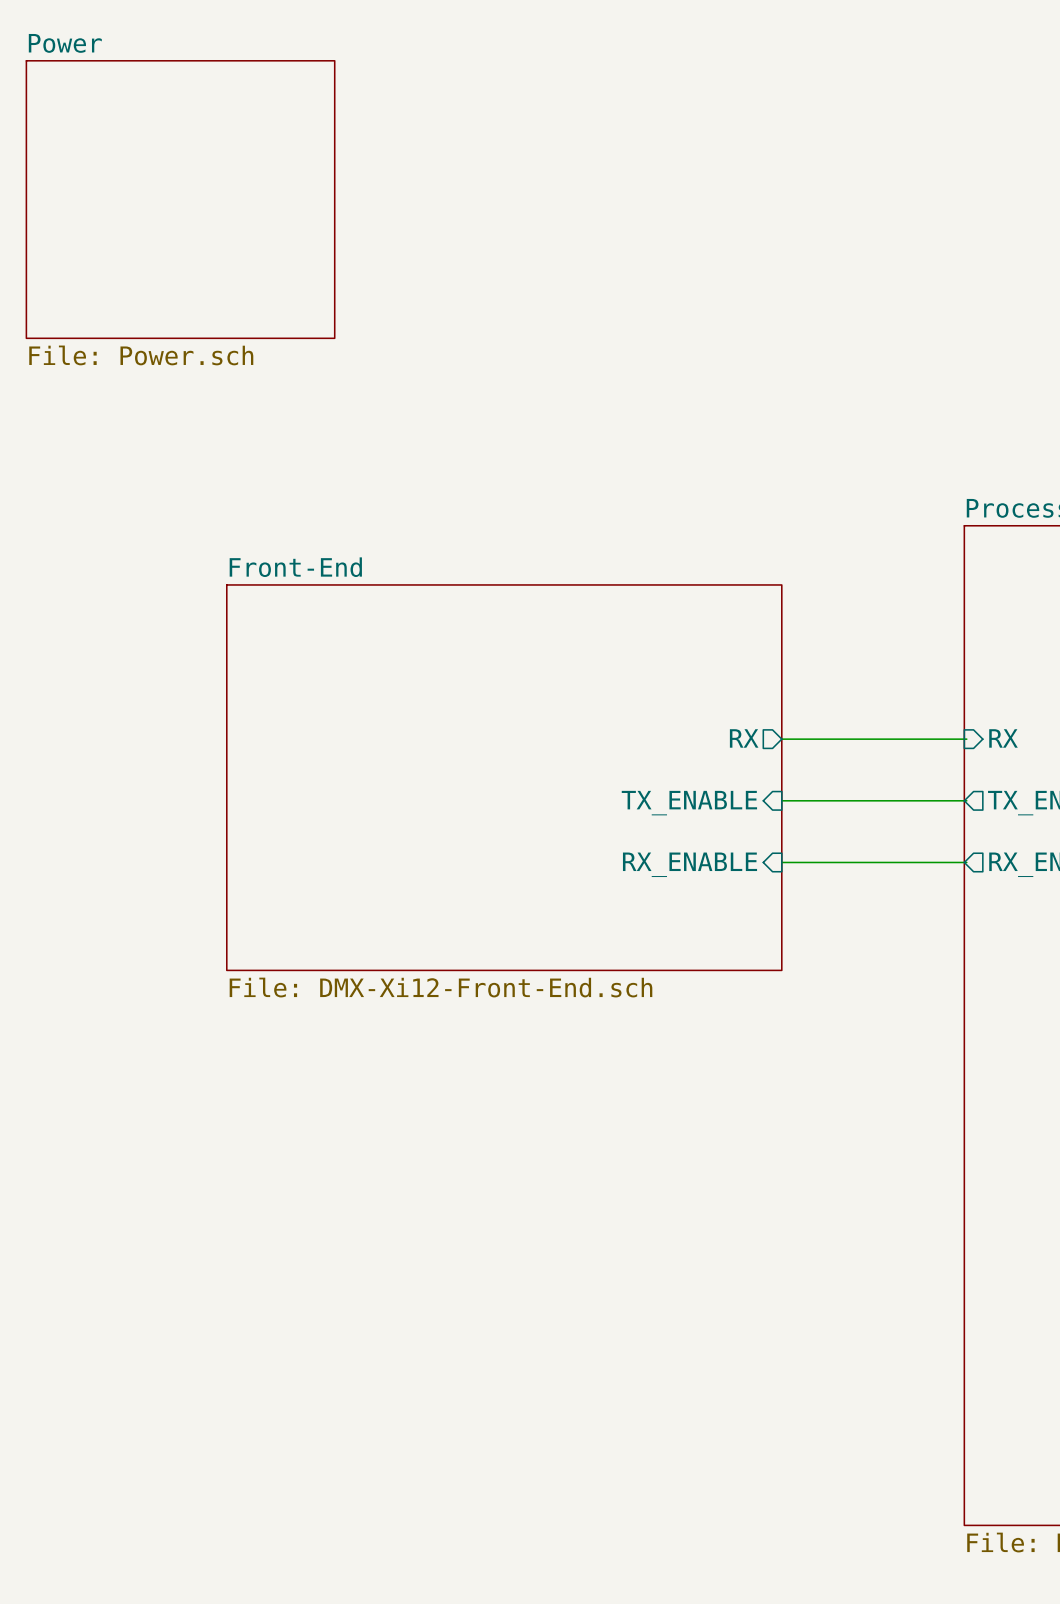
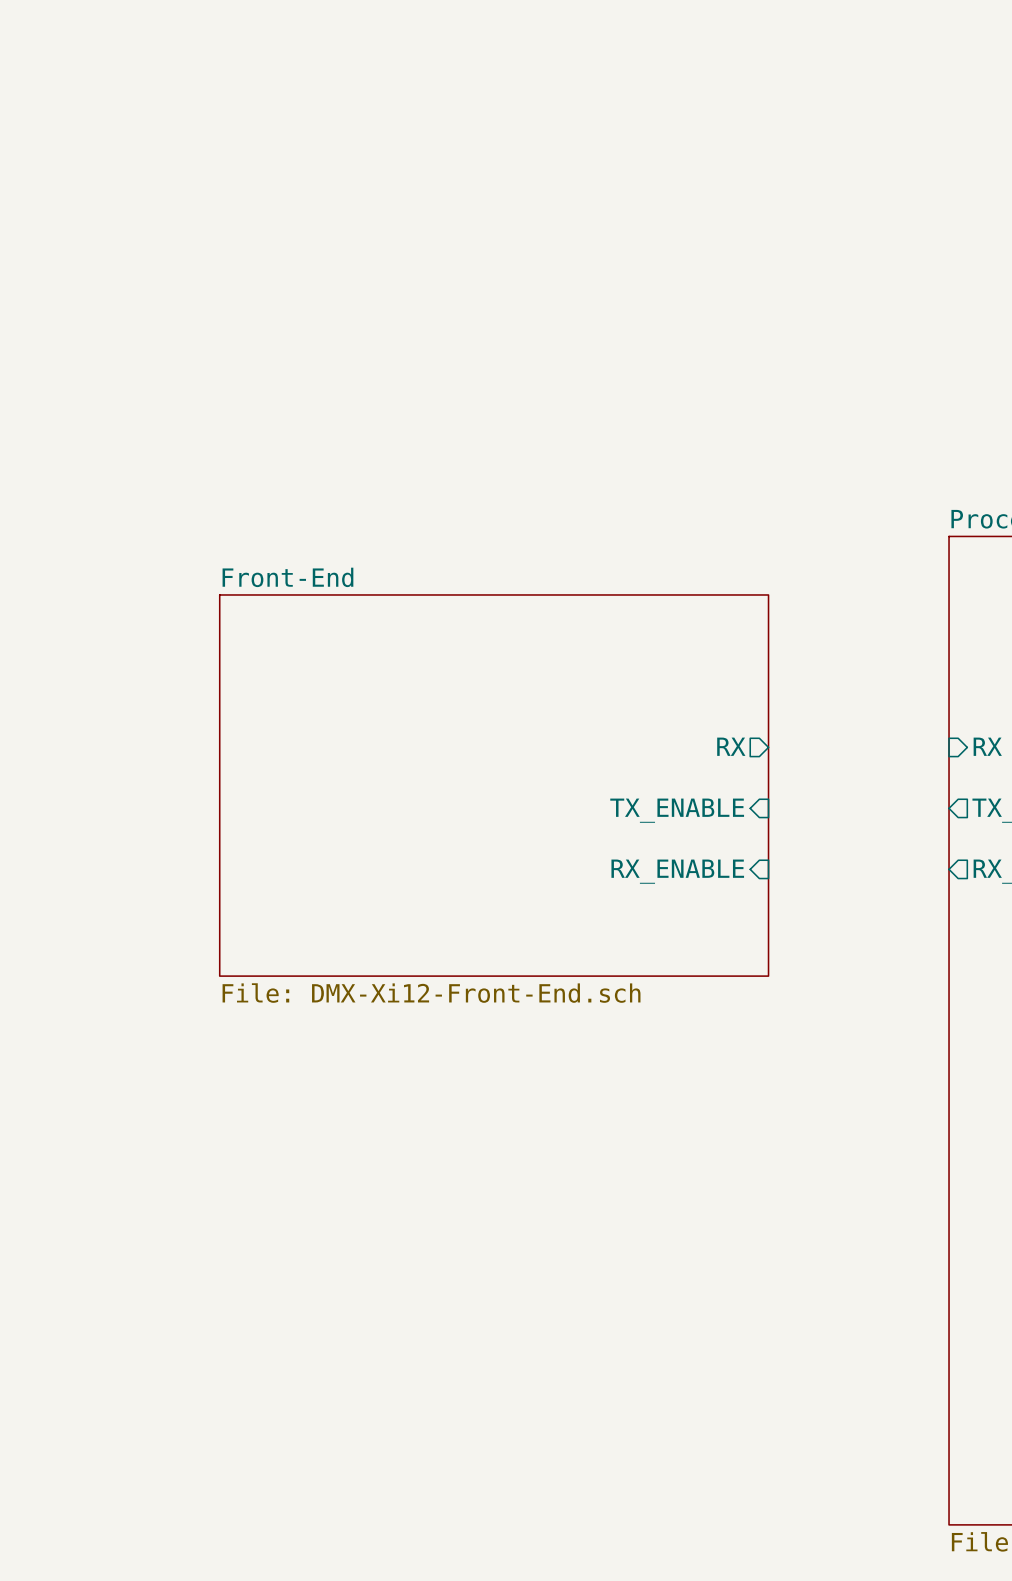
sheet Power: File: Power.sch (180, 199) -> none
wire: (781, 739) (966, 739) -> none
wire: (781, 800) (966, 800) -> none
wire: (781, 862) (966, 862) -> none

